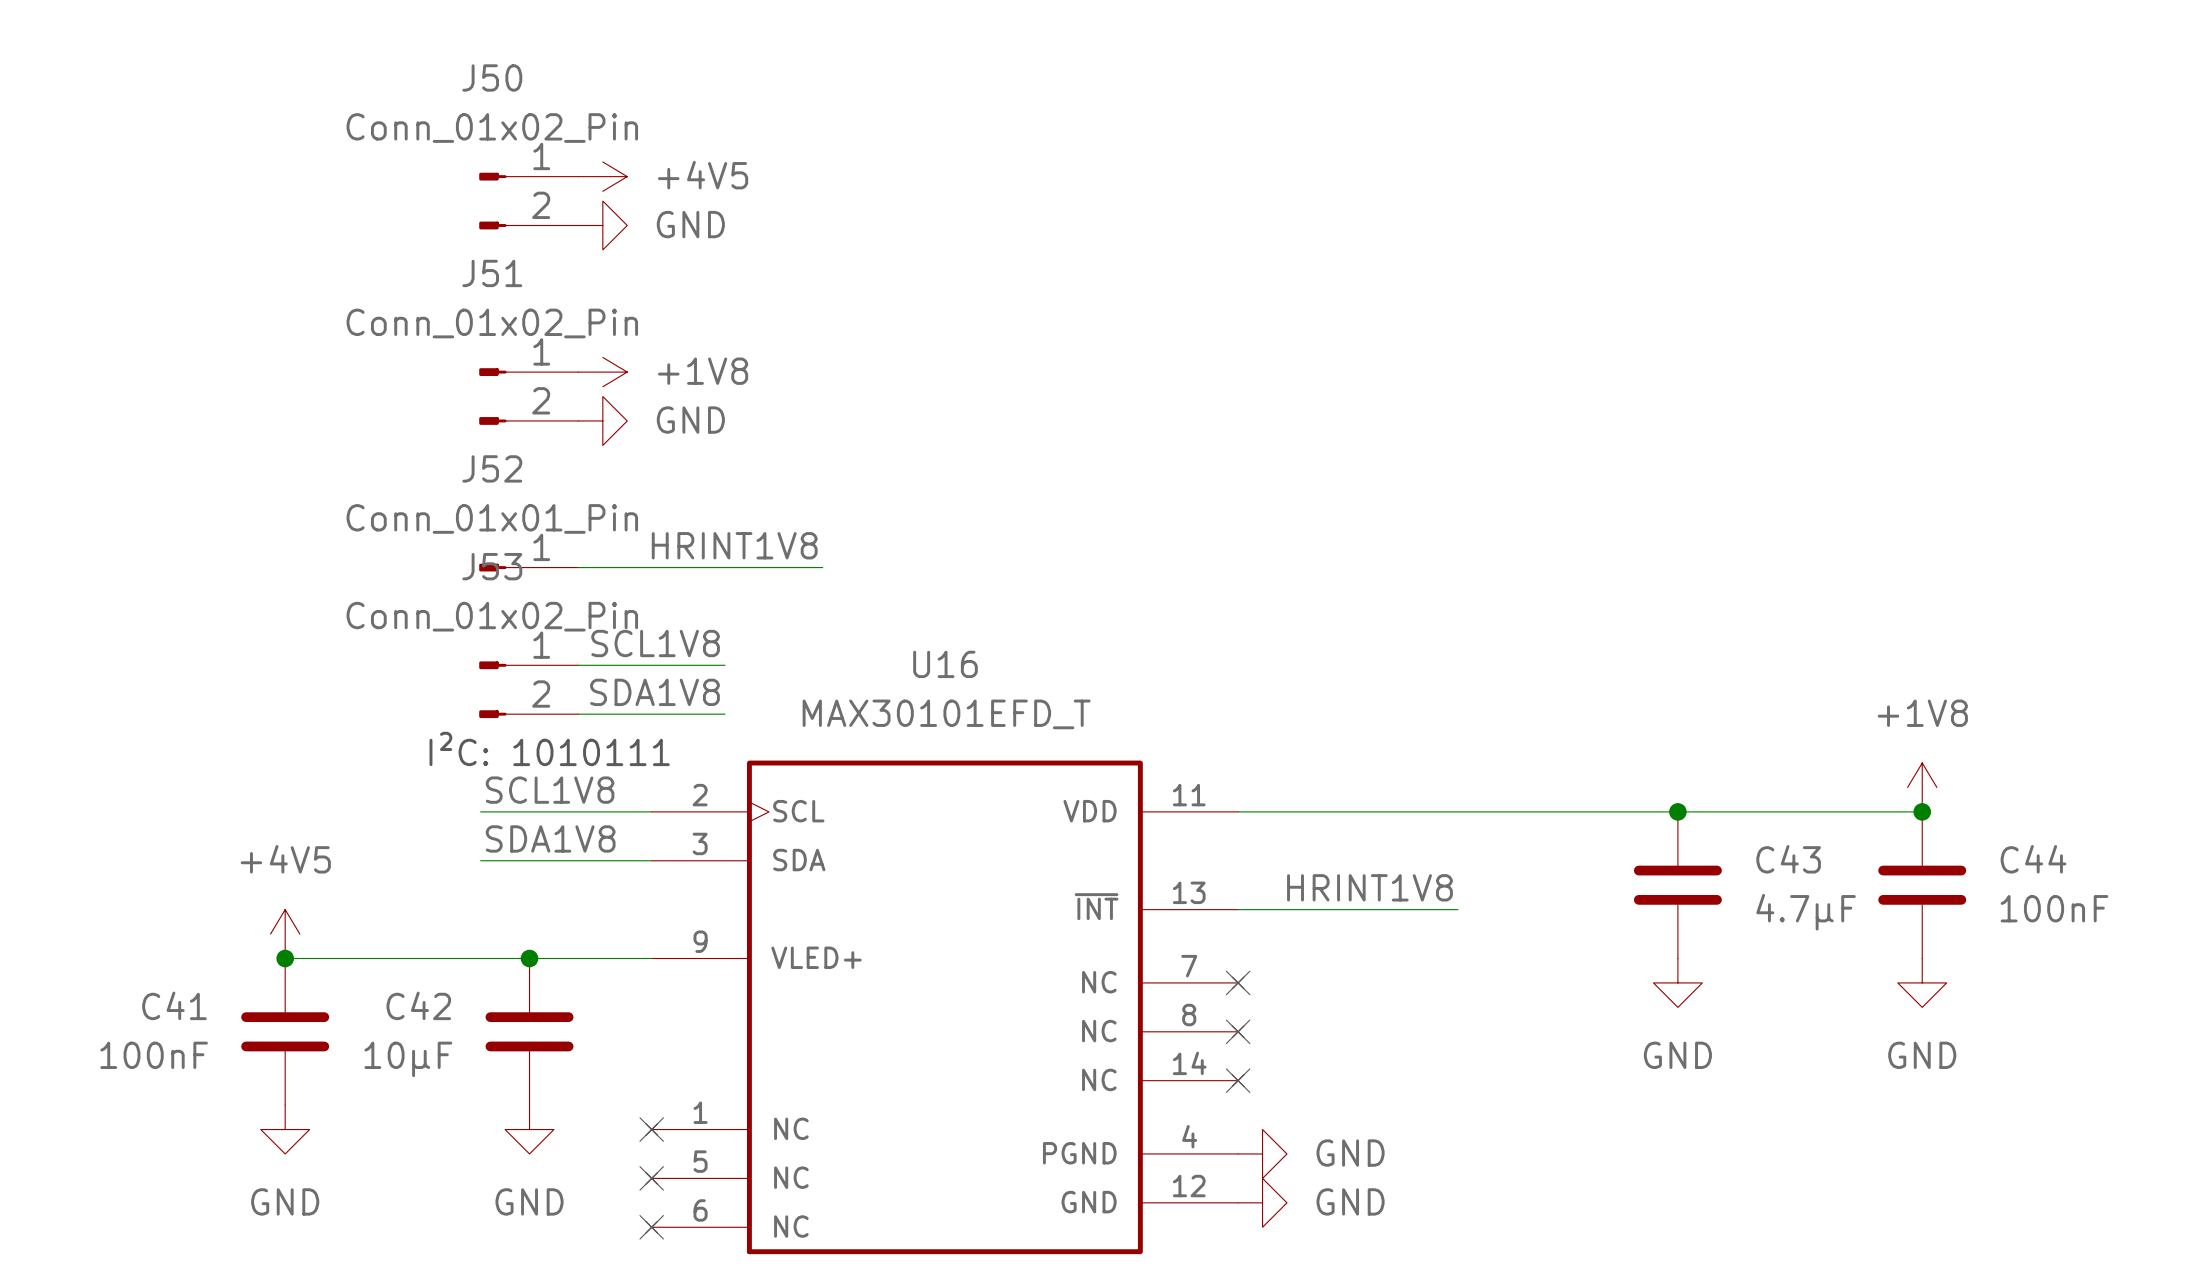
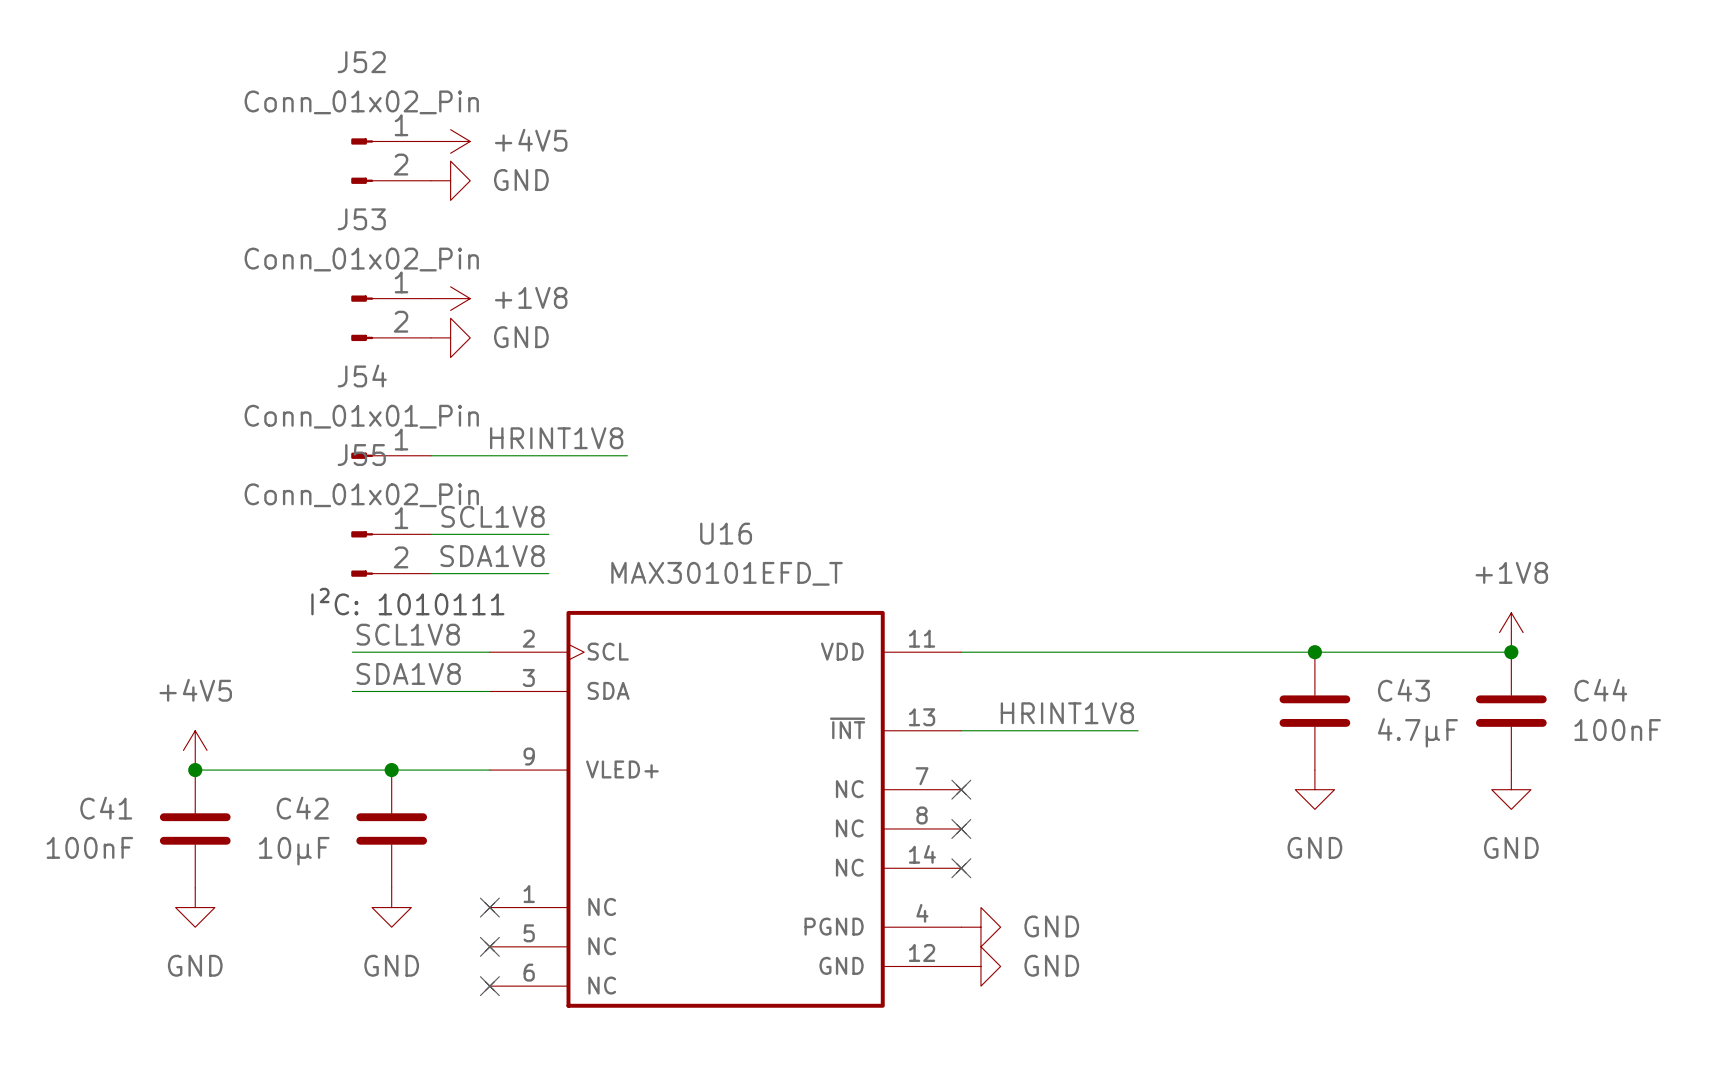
J50 name: J50 (492, 77) -> J52 (361, 62)
J51 name: J51 (492, 273) -> J53 (361, 219)
J52 name: J52 (492, 468) -> J54 (362, 375)
J53 name: J53 (492, 566) -> J55 (361, 455)

